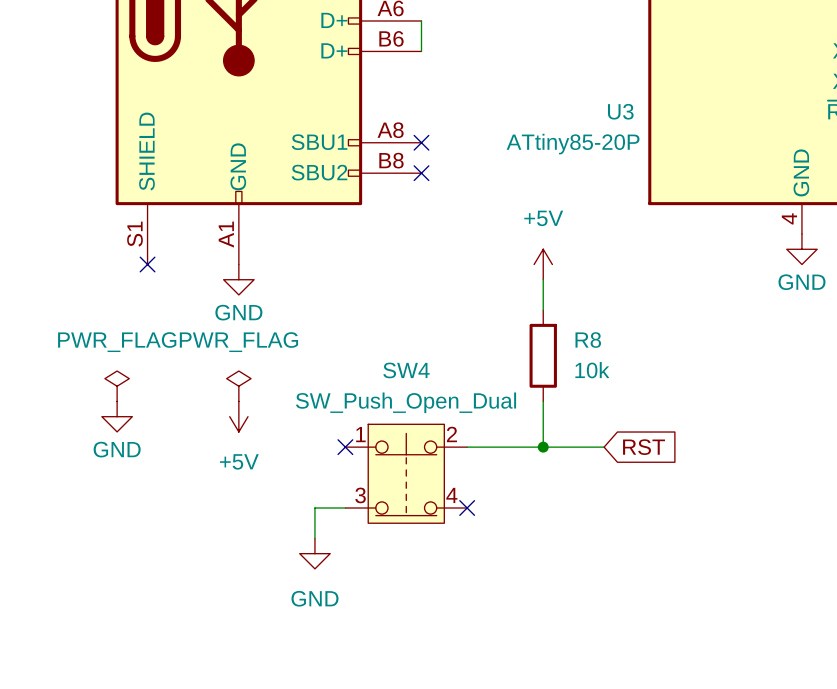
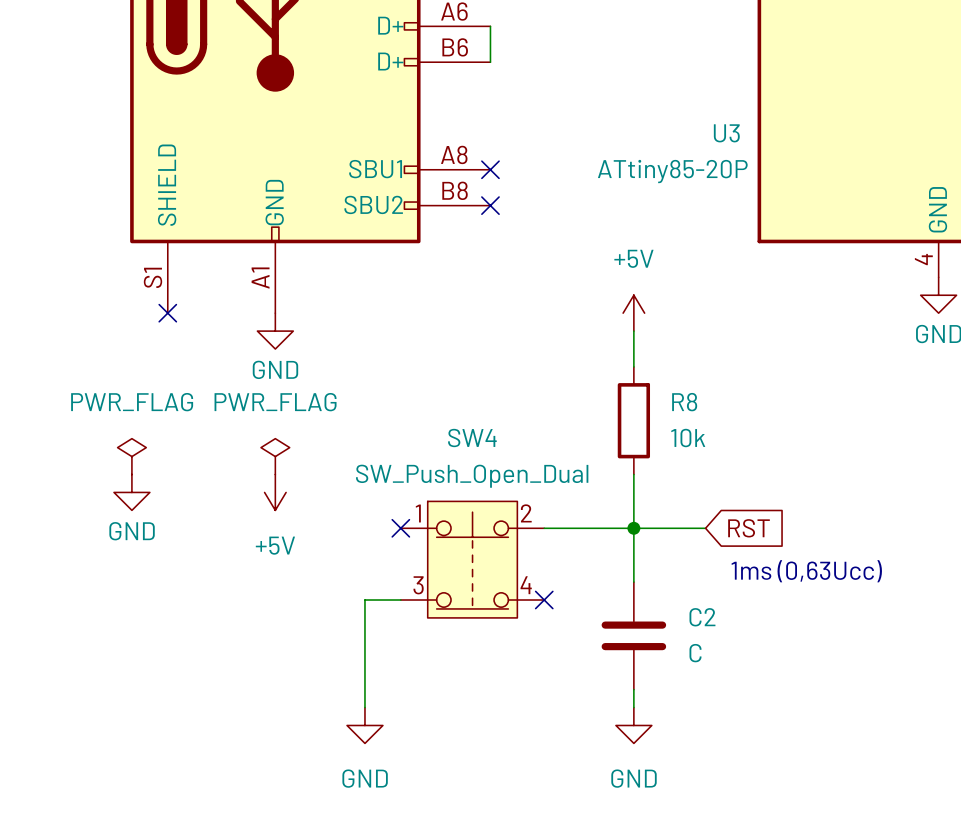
wire: none -> (633, 528) (633, 582)
text: none -> 1ms (0,63Ucc) (806, 571)
wire: none -> (364, 635) (364, 707)
C2: none -> C (633, 635)
power symbol position: GND (314, 553) -> GND (364, 725)
wire: none -> (633, 689) (633, 707)
power symbol: none -> GND (633, 725)

